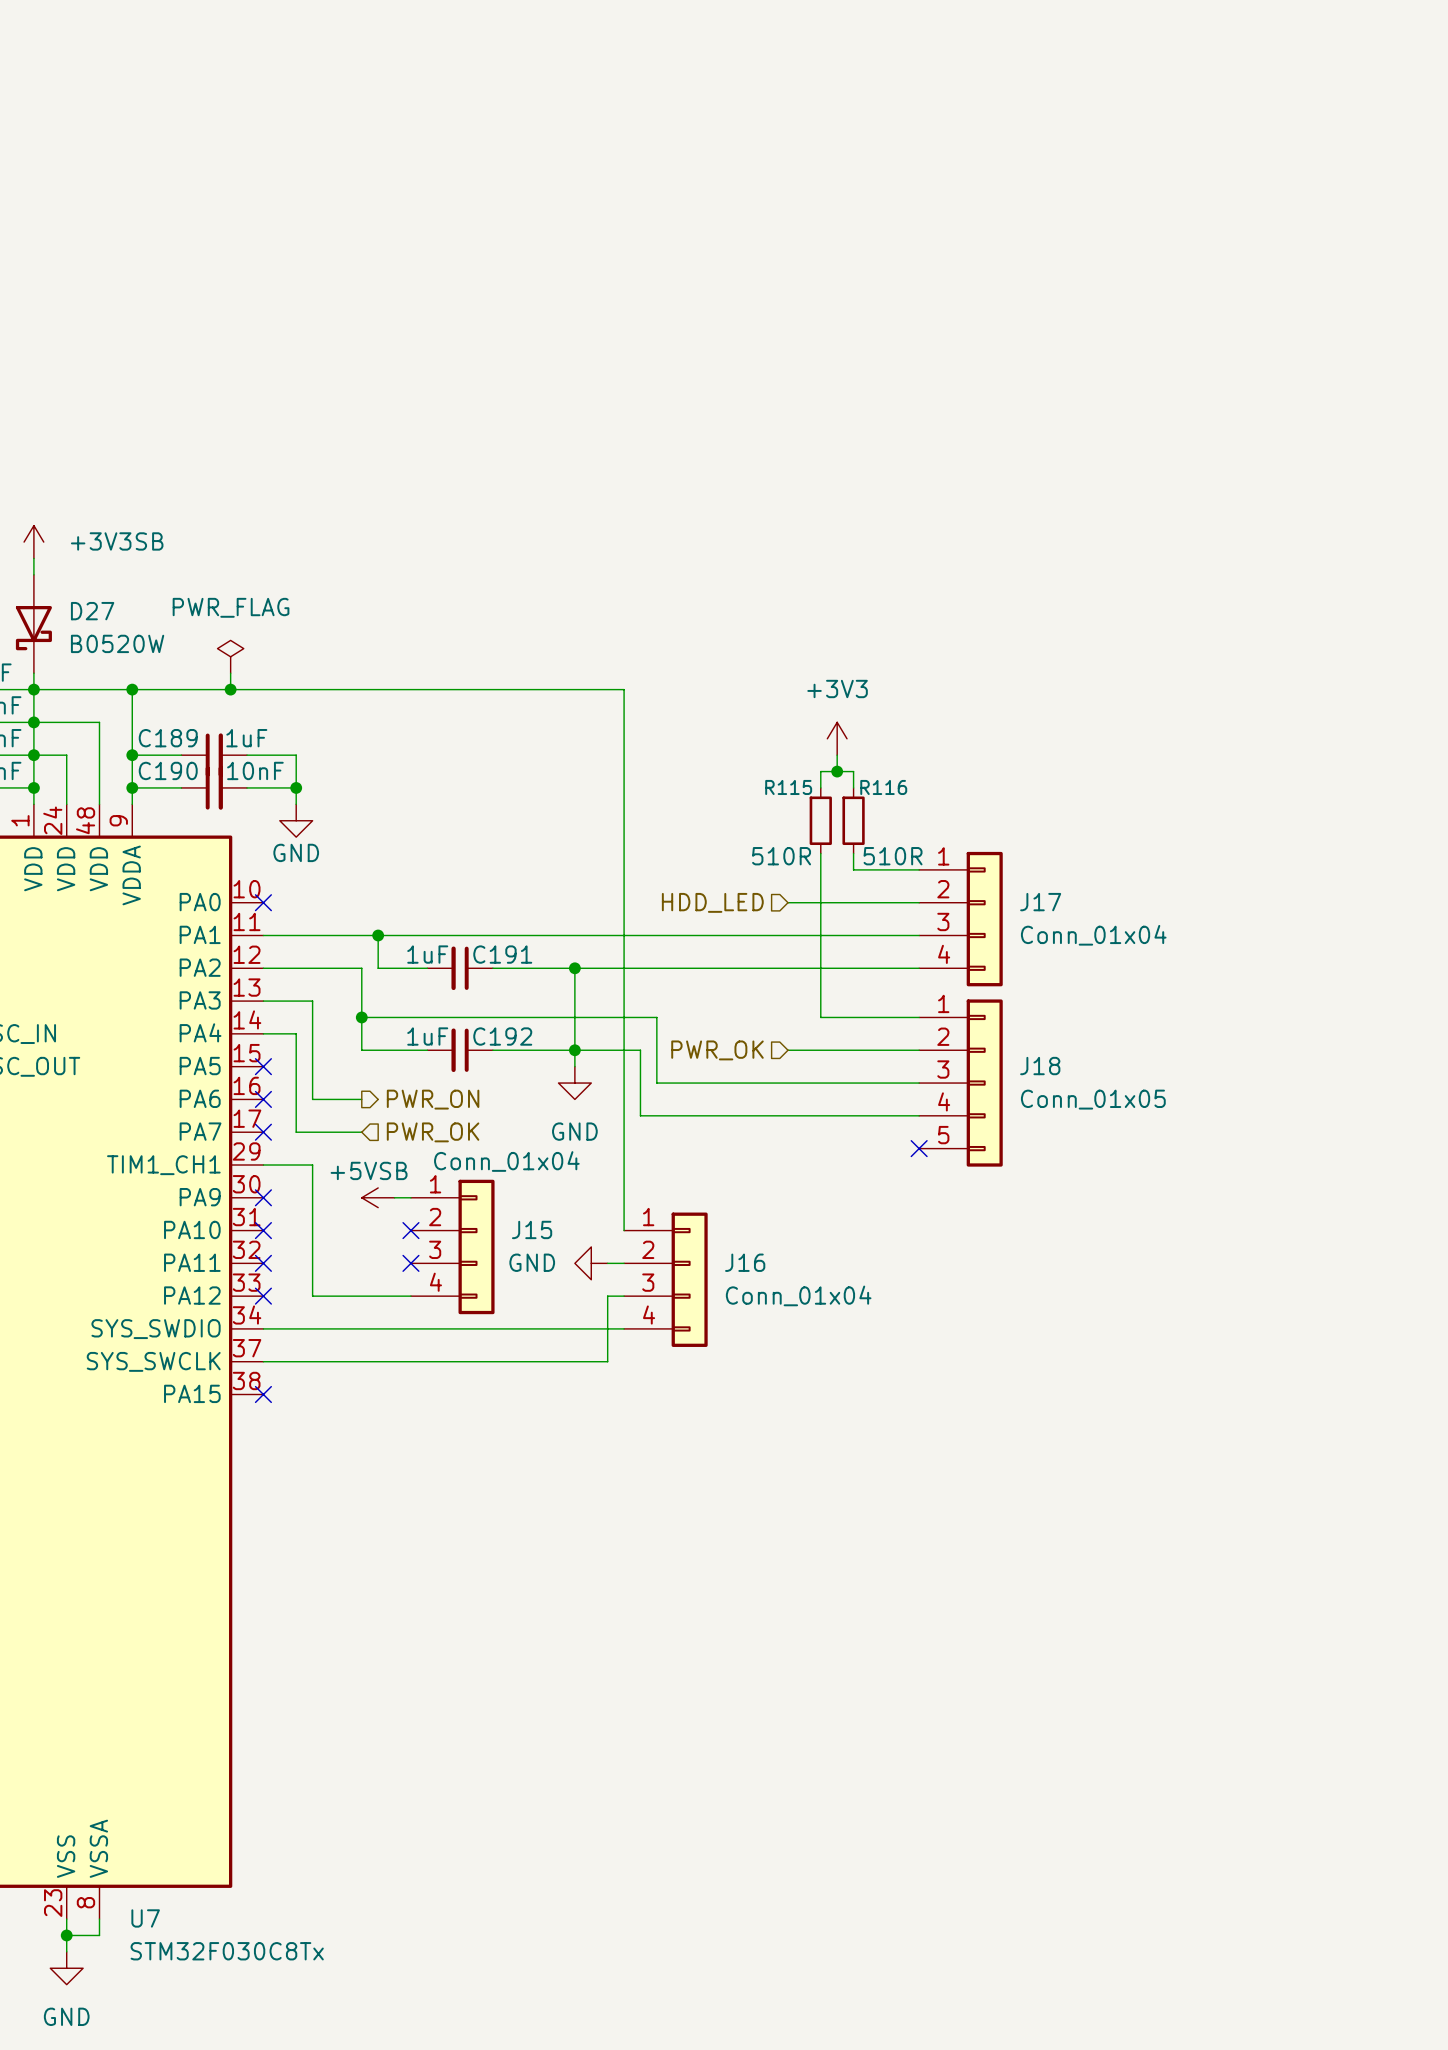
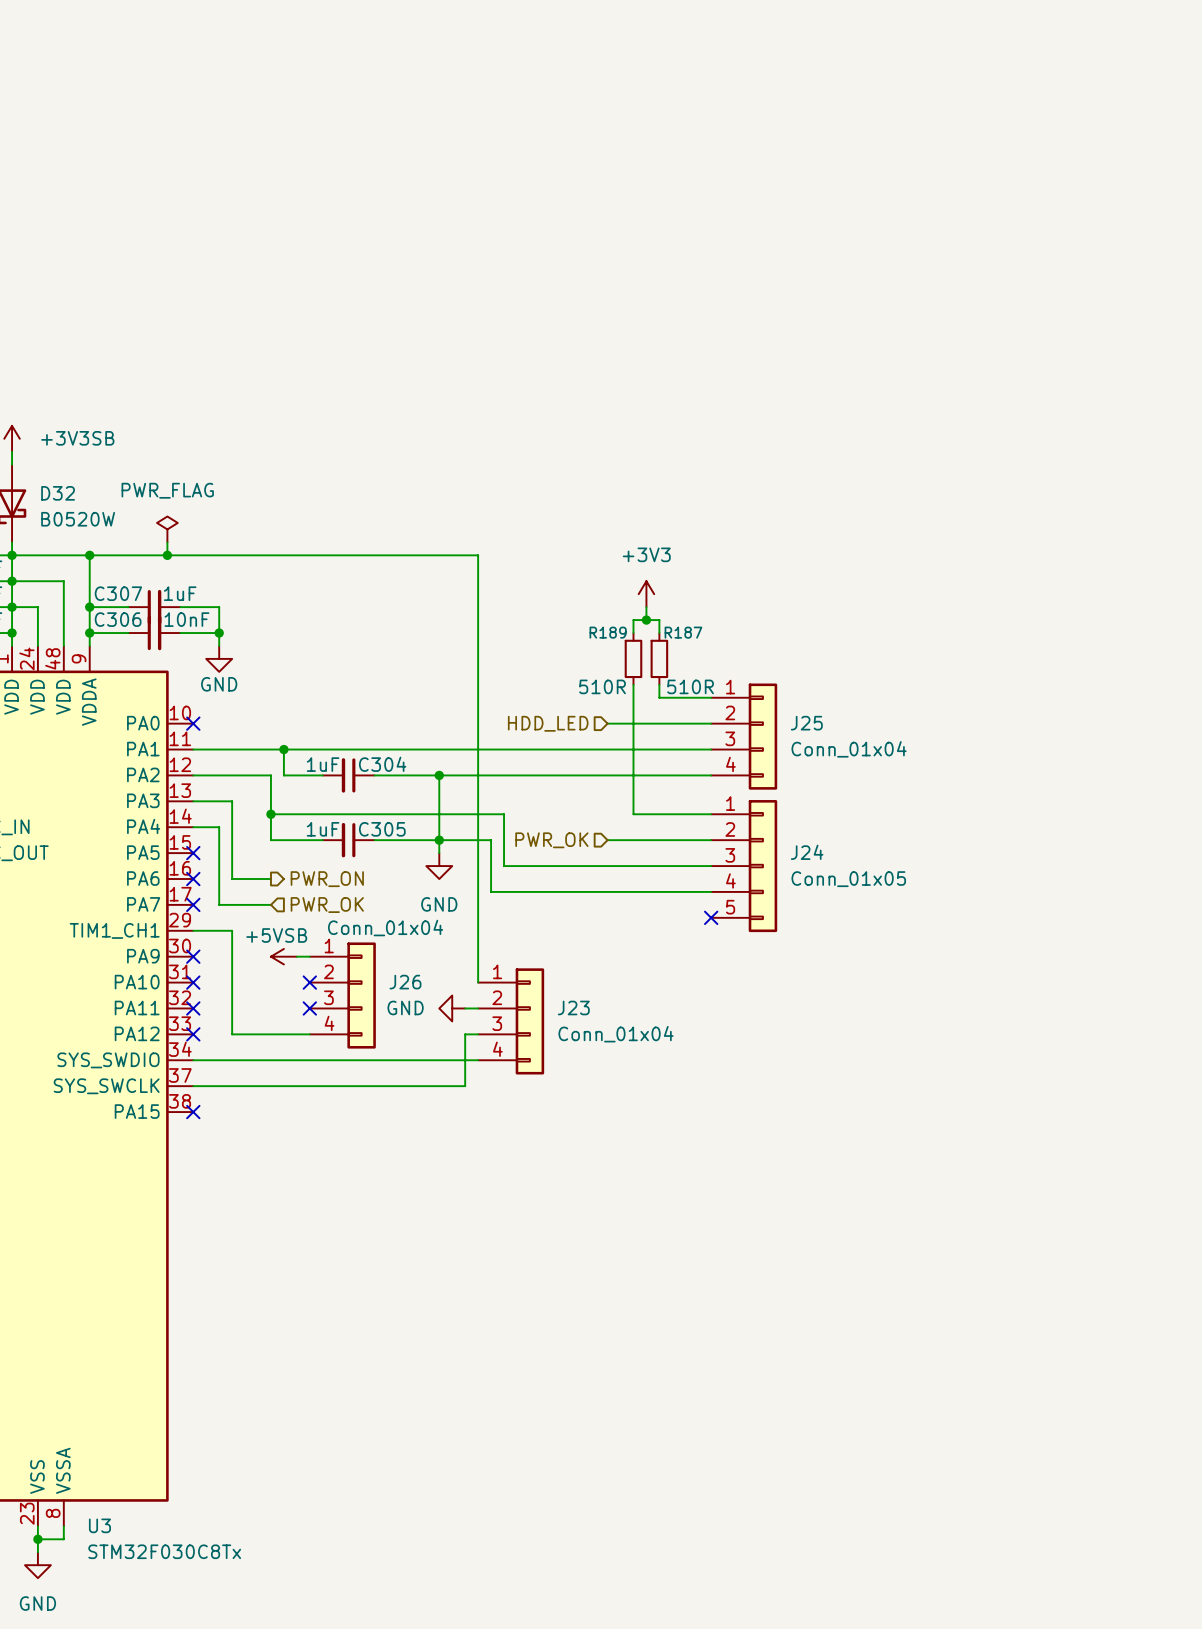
D27 name: D27 (92, 611) -> D32 (58, 493)
C189 name: C189 (168, 738) -> C307 (118, 593)
C190 name: C190 (168, 770) -> C306 (118, 619)
R115 name: R115 (788, 787) -> R189 (608, 632)
R116 name: R116 (883, 787) -> R187 (683, 632)
J17 name: J17 (1040, 902) -> J25 (806, 723)
C191 name: C191 (502, 954) -> C304 (382, 764)
C192 name: C192 (502, 1036) -> C305 (382, 829)
J18 name: J18 (1040, 1066) -> J24 (807, 852)
J15 name: J15 (532, 1229) -> J26 (405, 982)
J16 name: J16 (745, 1262) -> J23 (573, 1007)
U7 name: U7 (145, 1918) -> U3 (99, 1525)

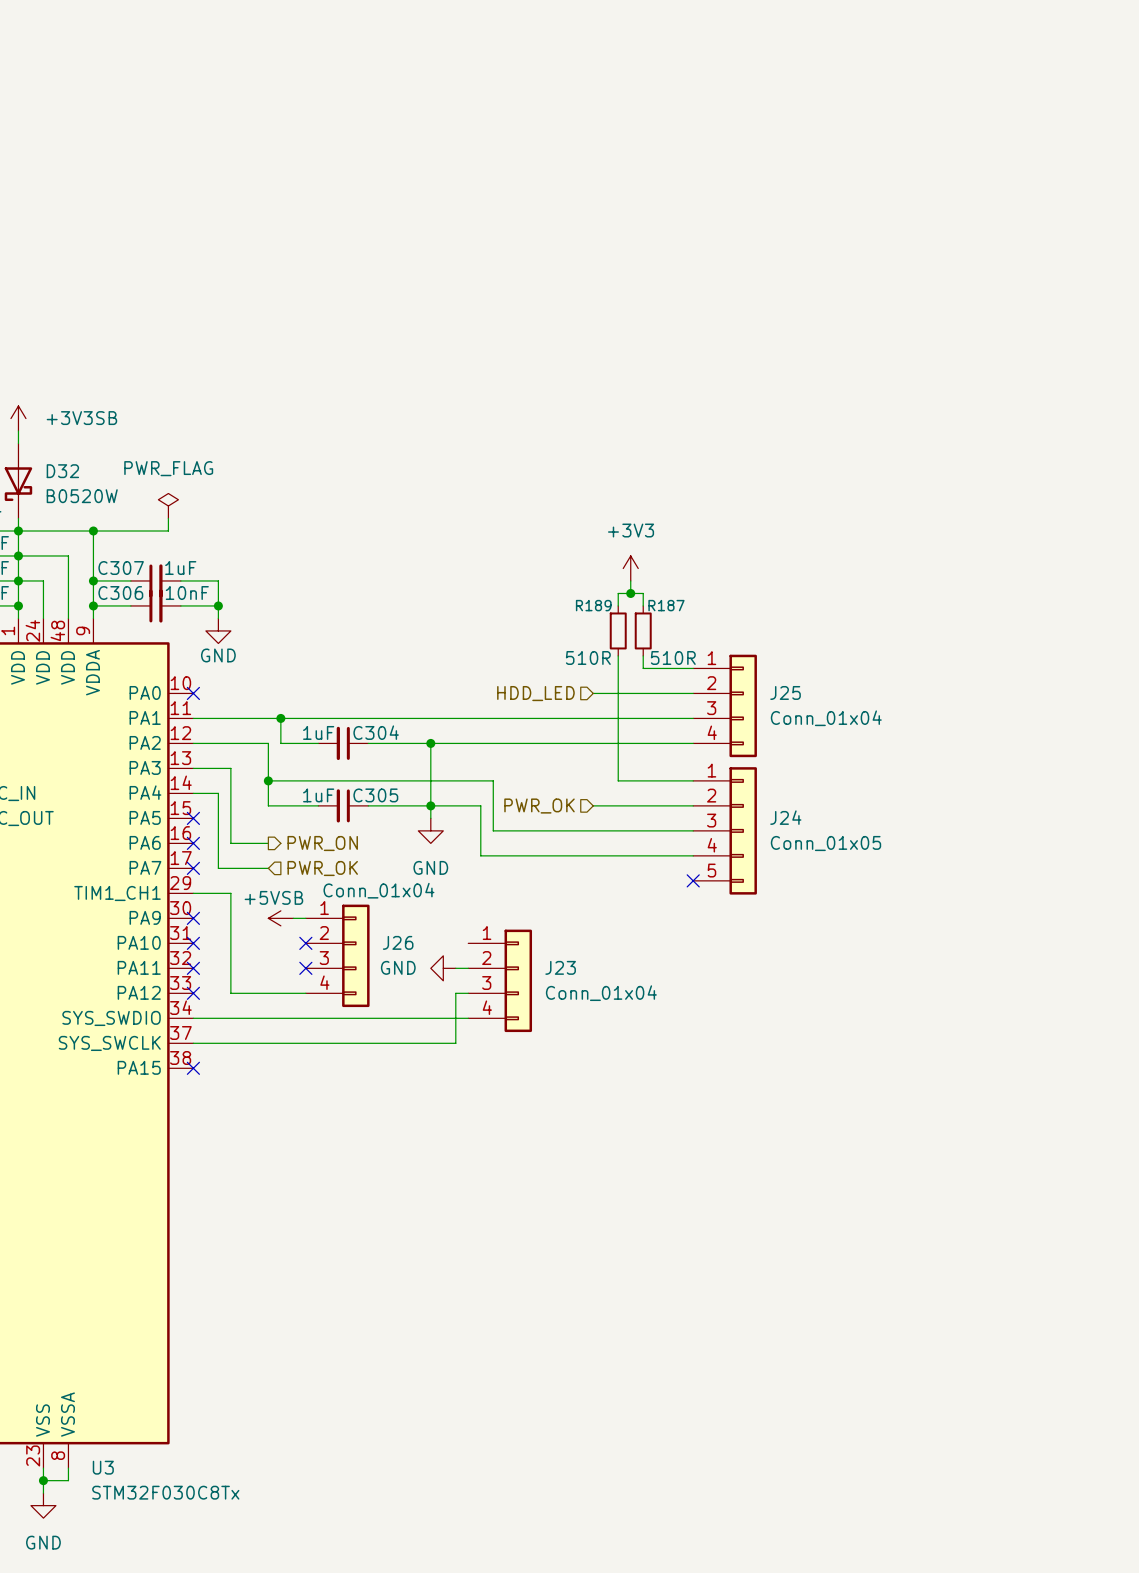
wire: (167, 555) (478, 555) (478, 982) -> none
junction: (167, 555) -> none

